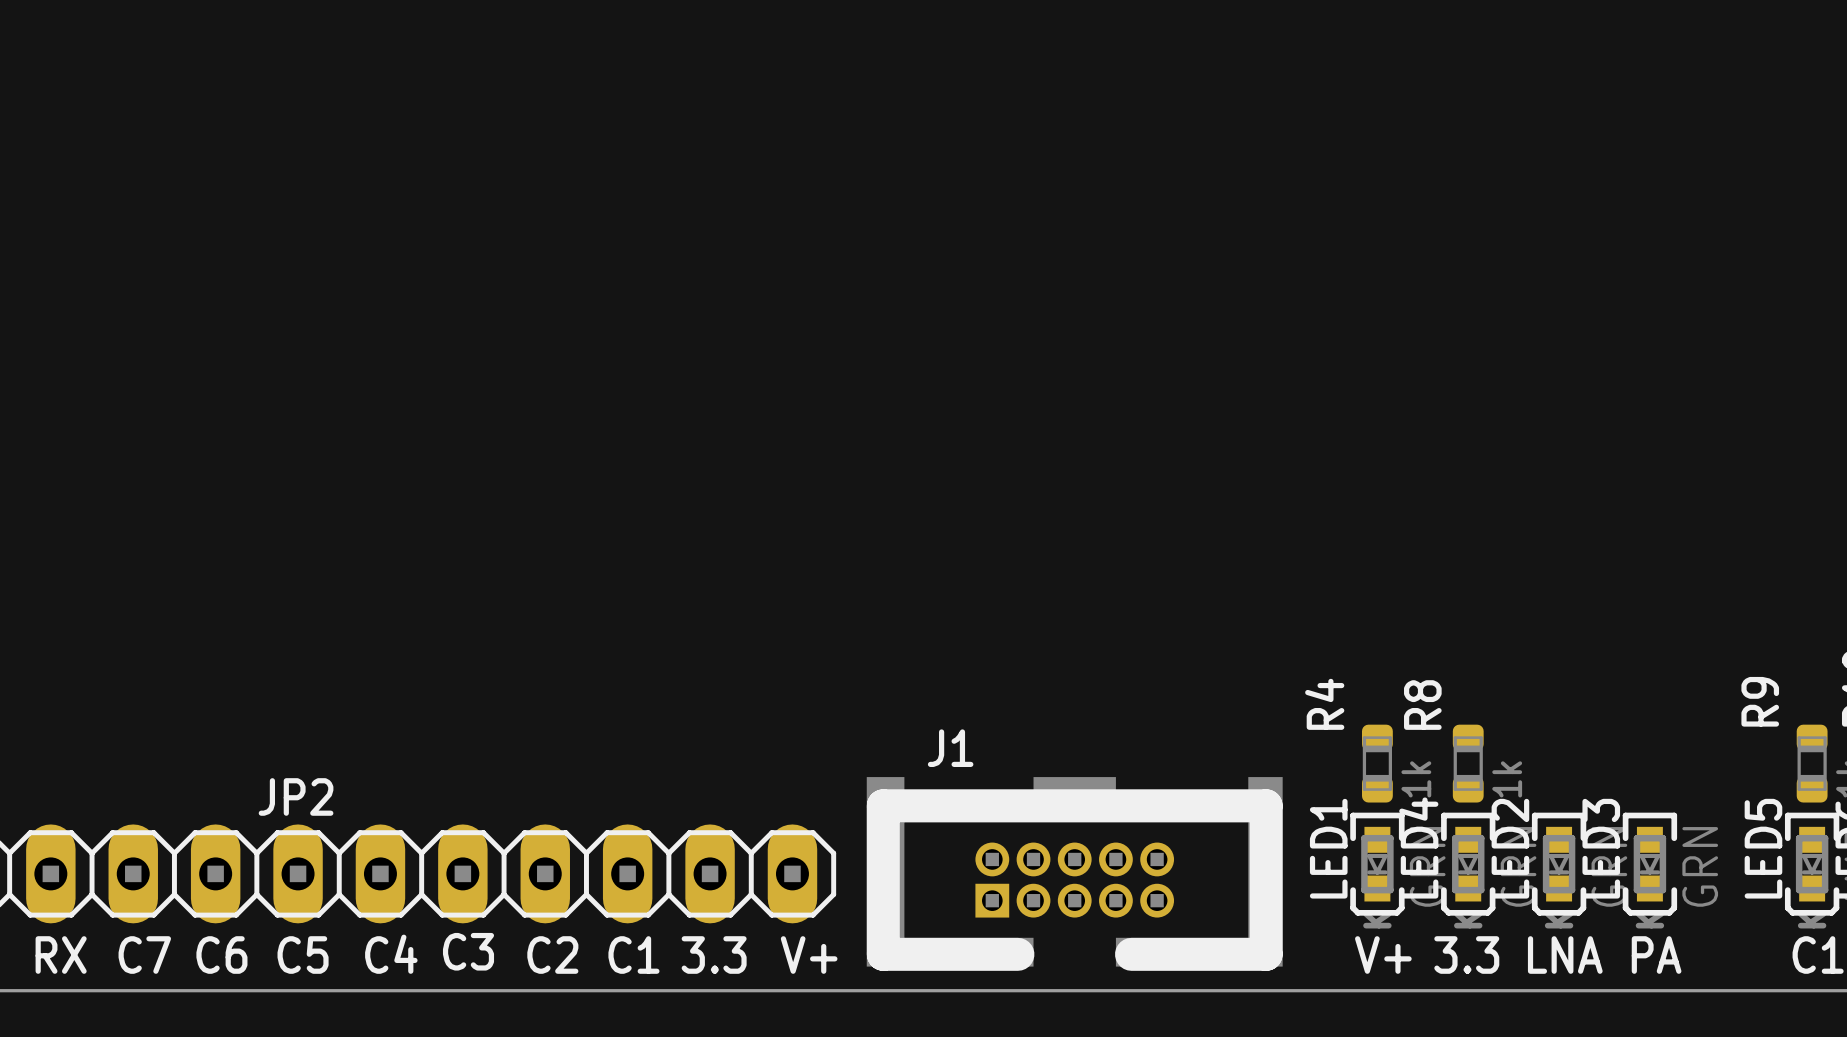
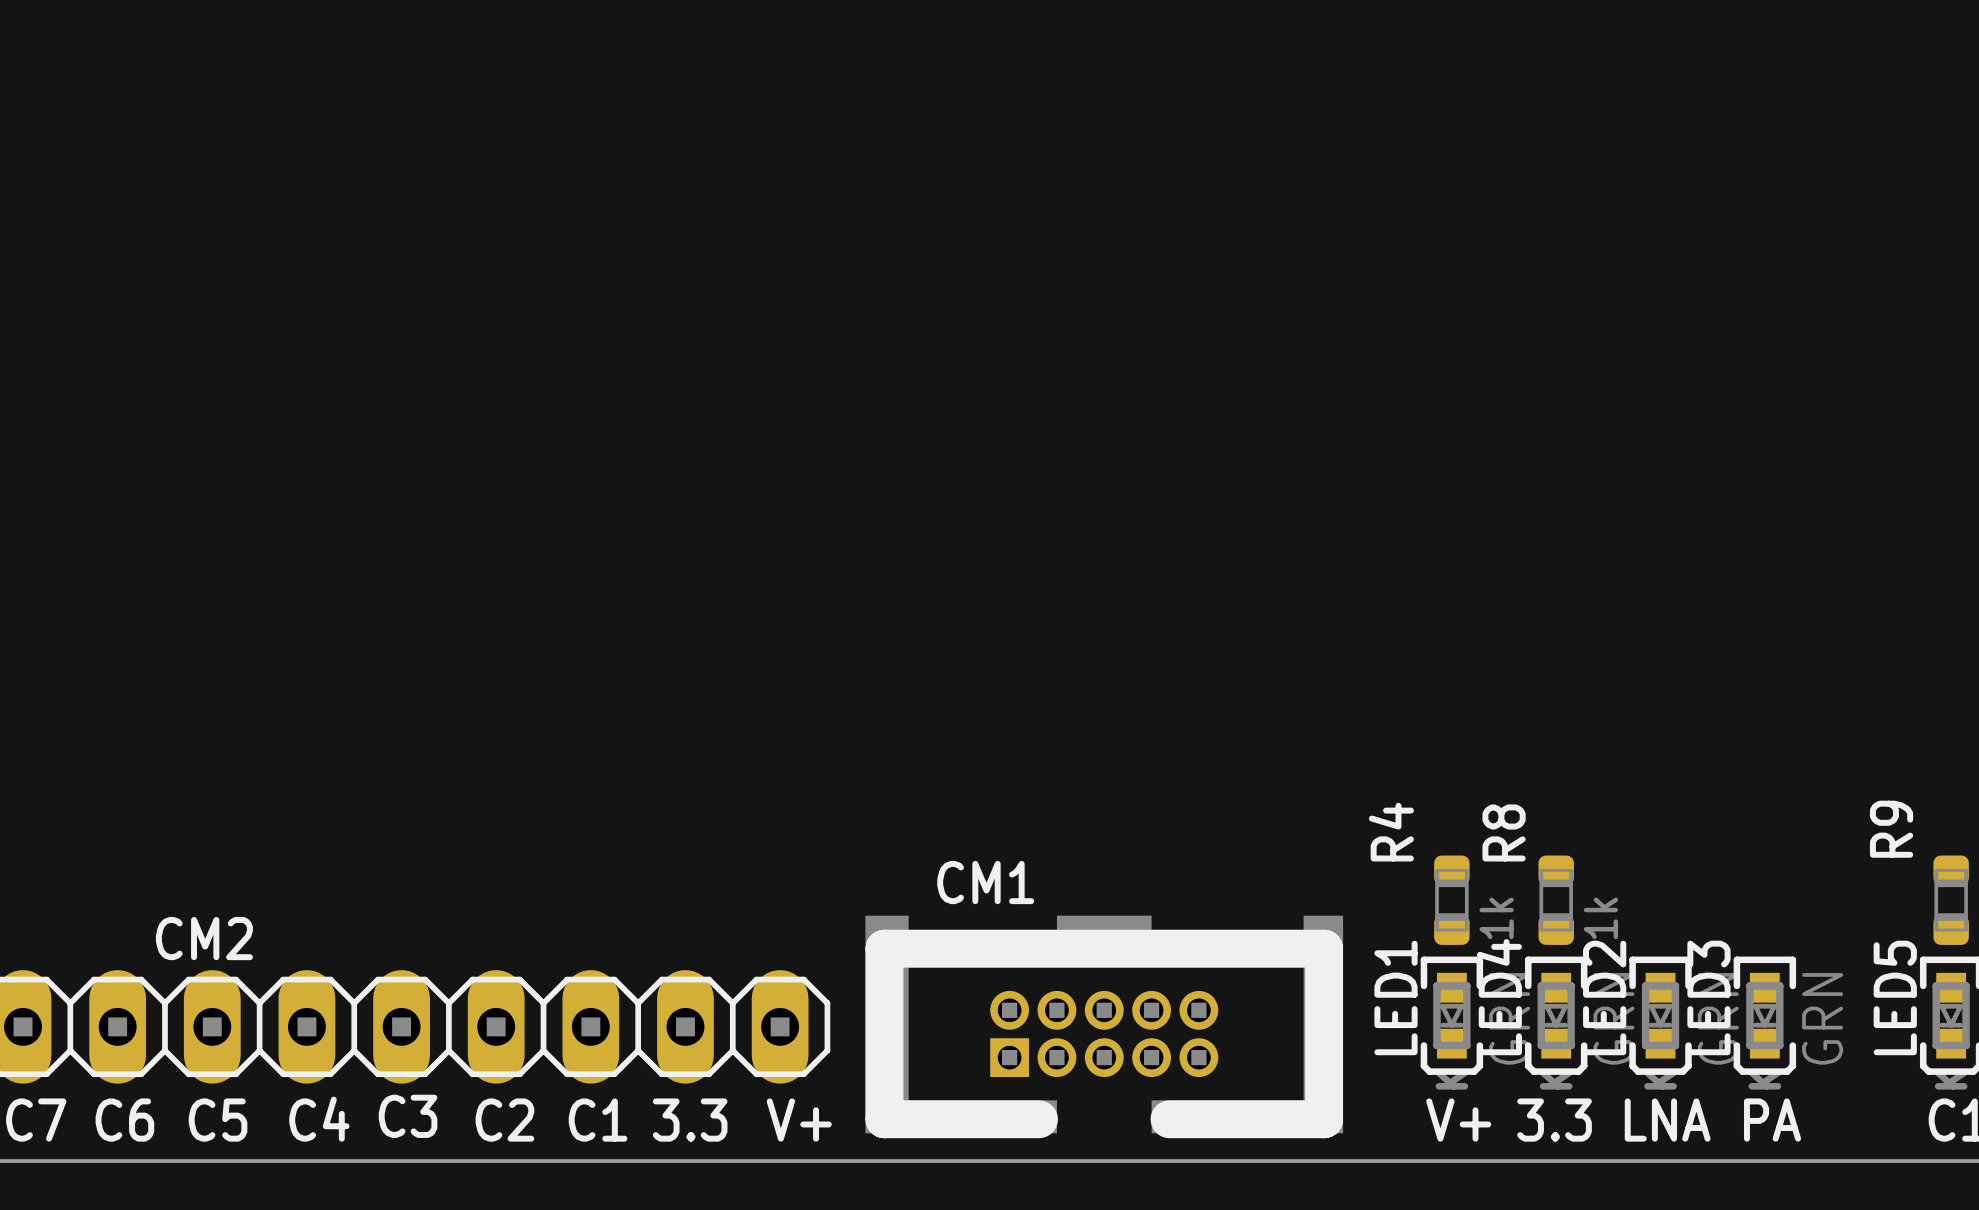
J1 name: J1 (950, 748) -> CM1 (985, 882)
JP2 name: JP2 (296, 796) -> CM2 (204, 938)

